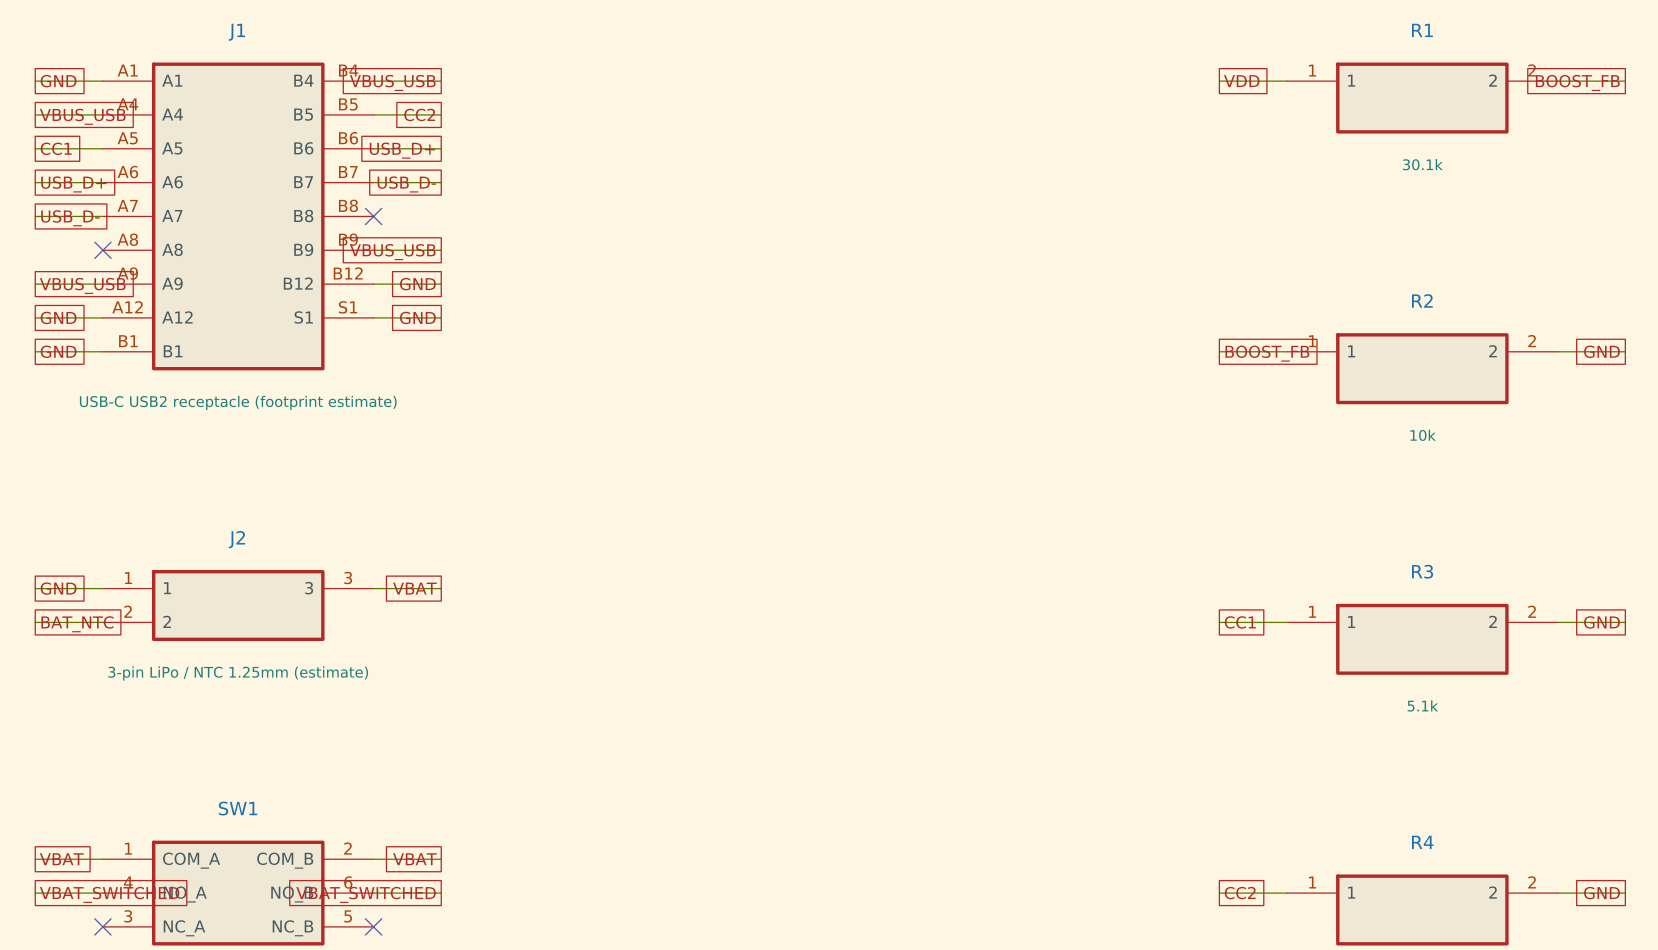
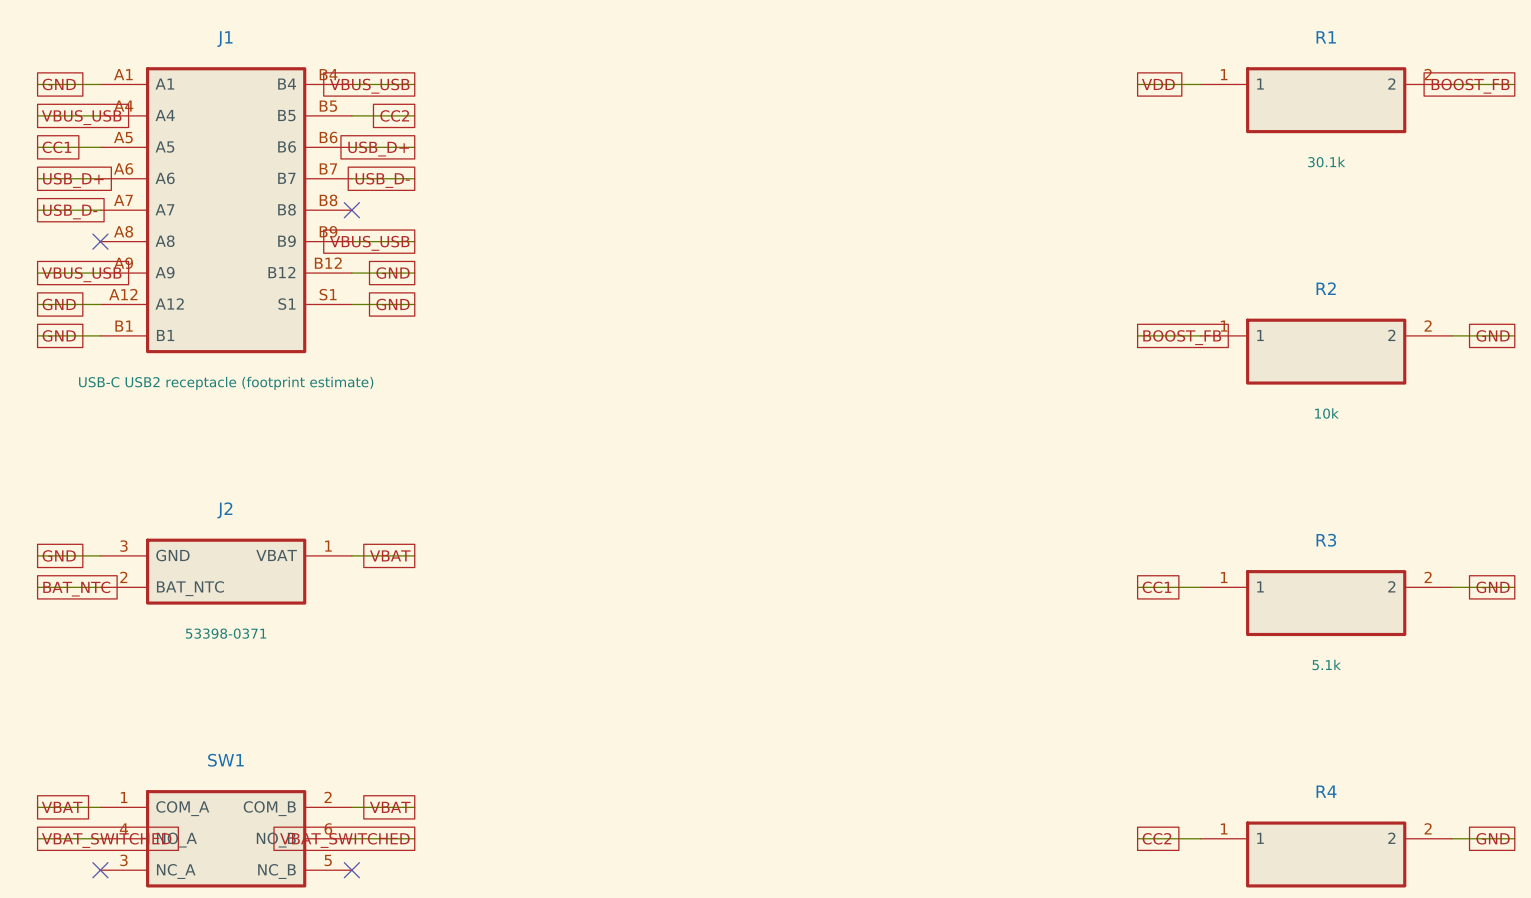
J2 pin number: 1 (128, 578) -> 3 (123, 546)
J2 pin number: 3 (348, 578) -> 1 (328, 546)
J2 pin name: 1 (167, 588) -> GND (172, 555)
J2 pin name: 3 (309, 588) -> VBAT (276, 555)
J2 pin name: 2 (167, 621) -> BAT_NTC (190, 588)
J2 value: 3-pin LiPo / NTC 1.25mm (estimate) (238, 673) -> 53398-0371 (226, 633)

